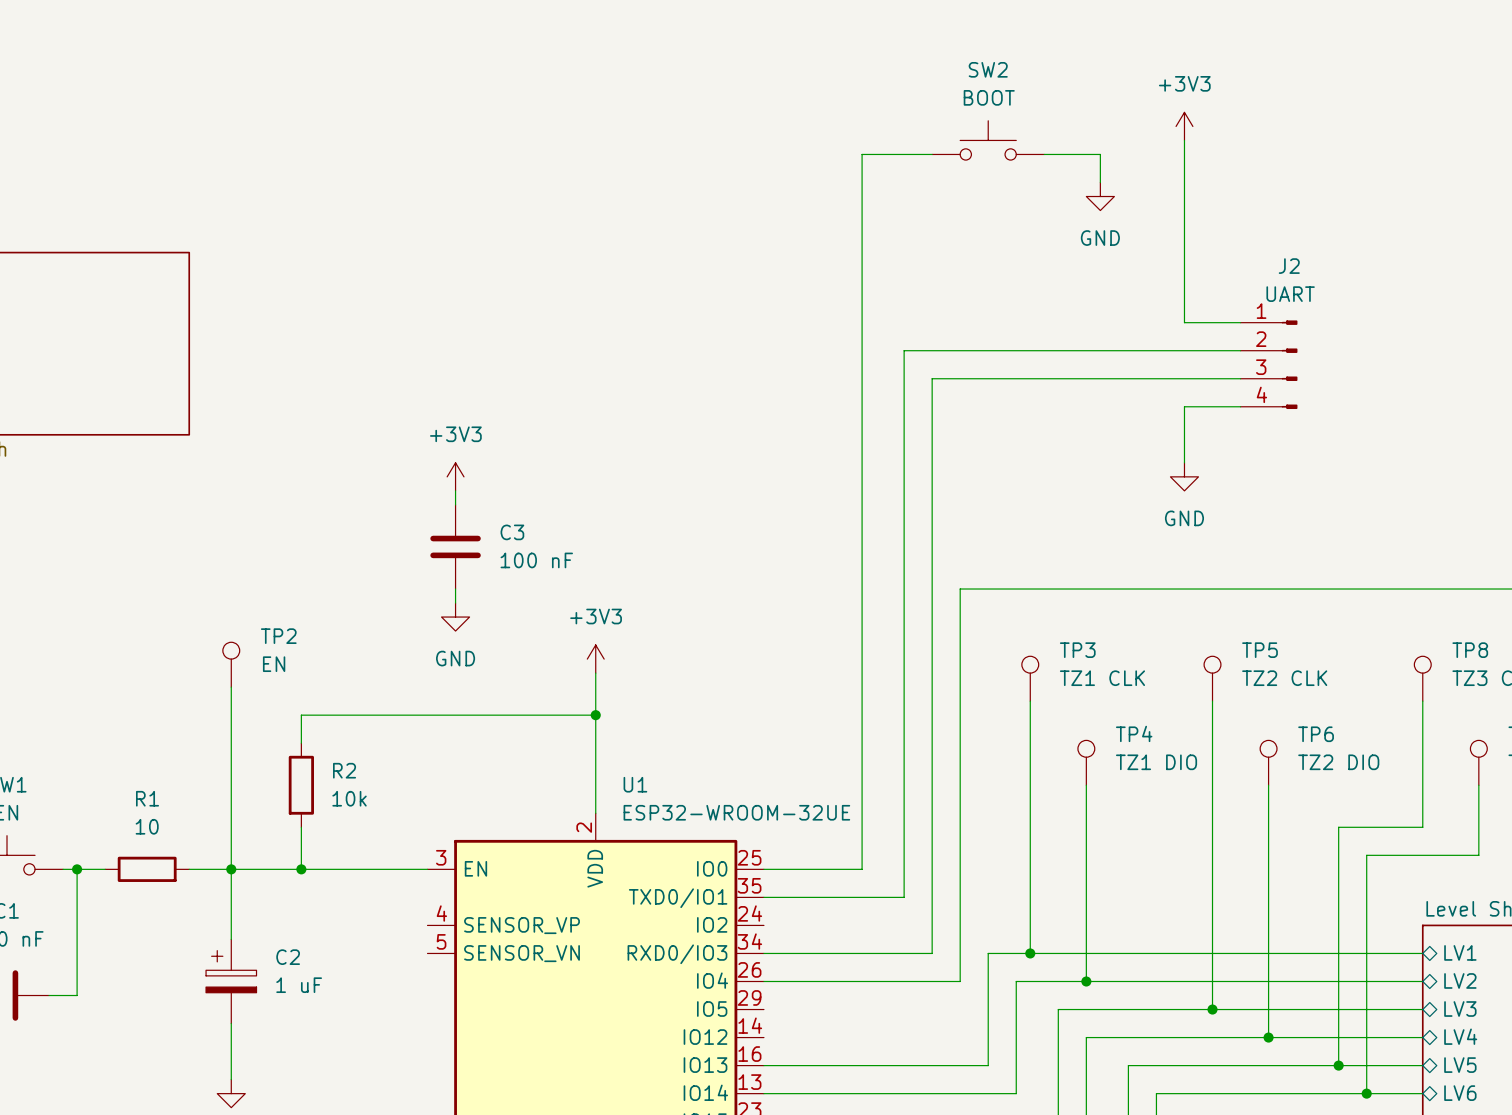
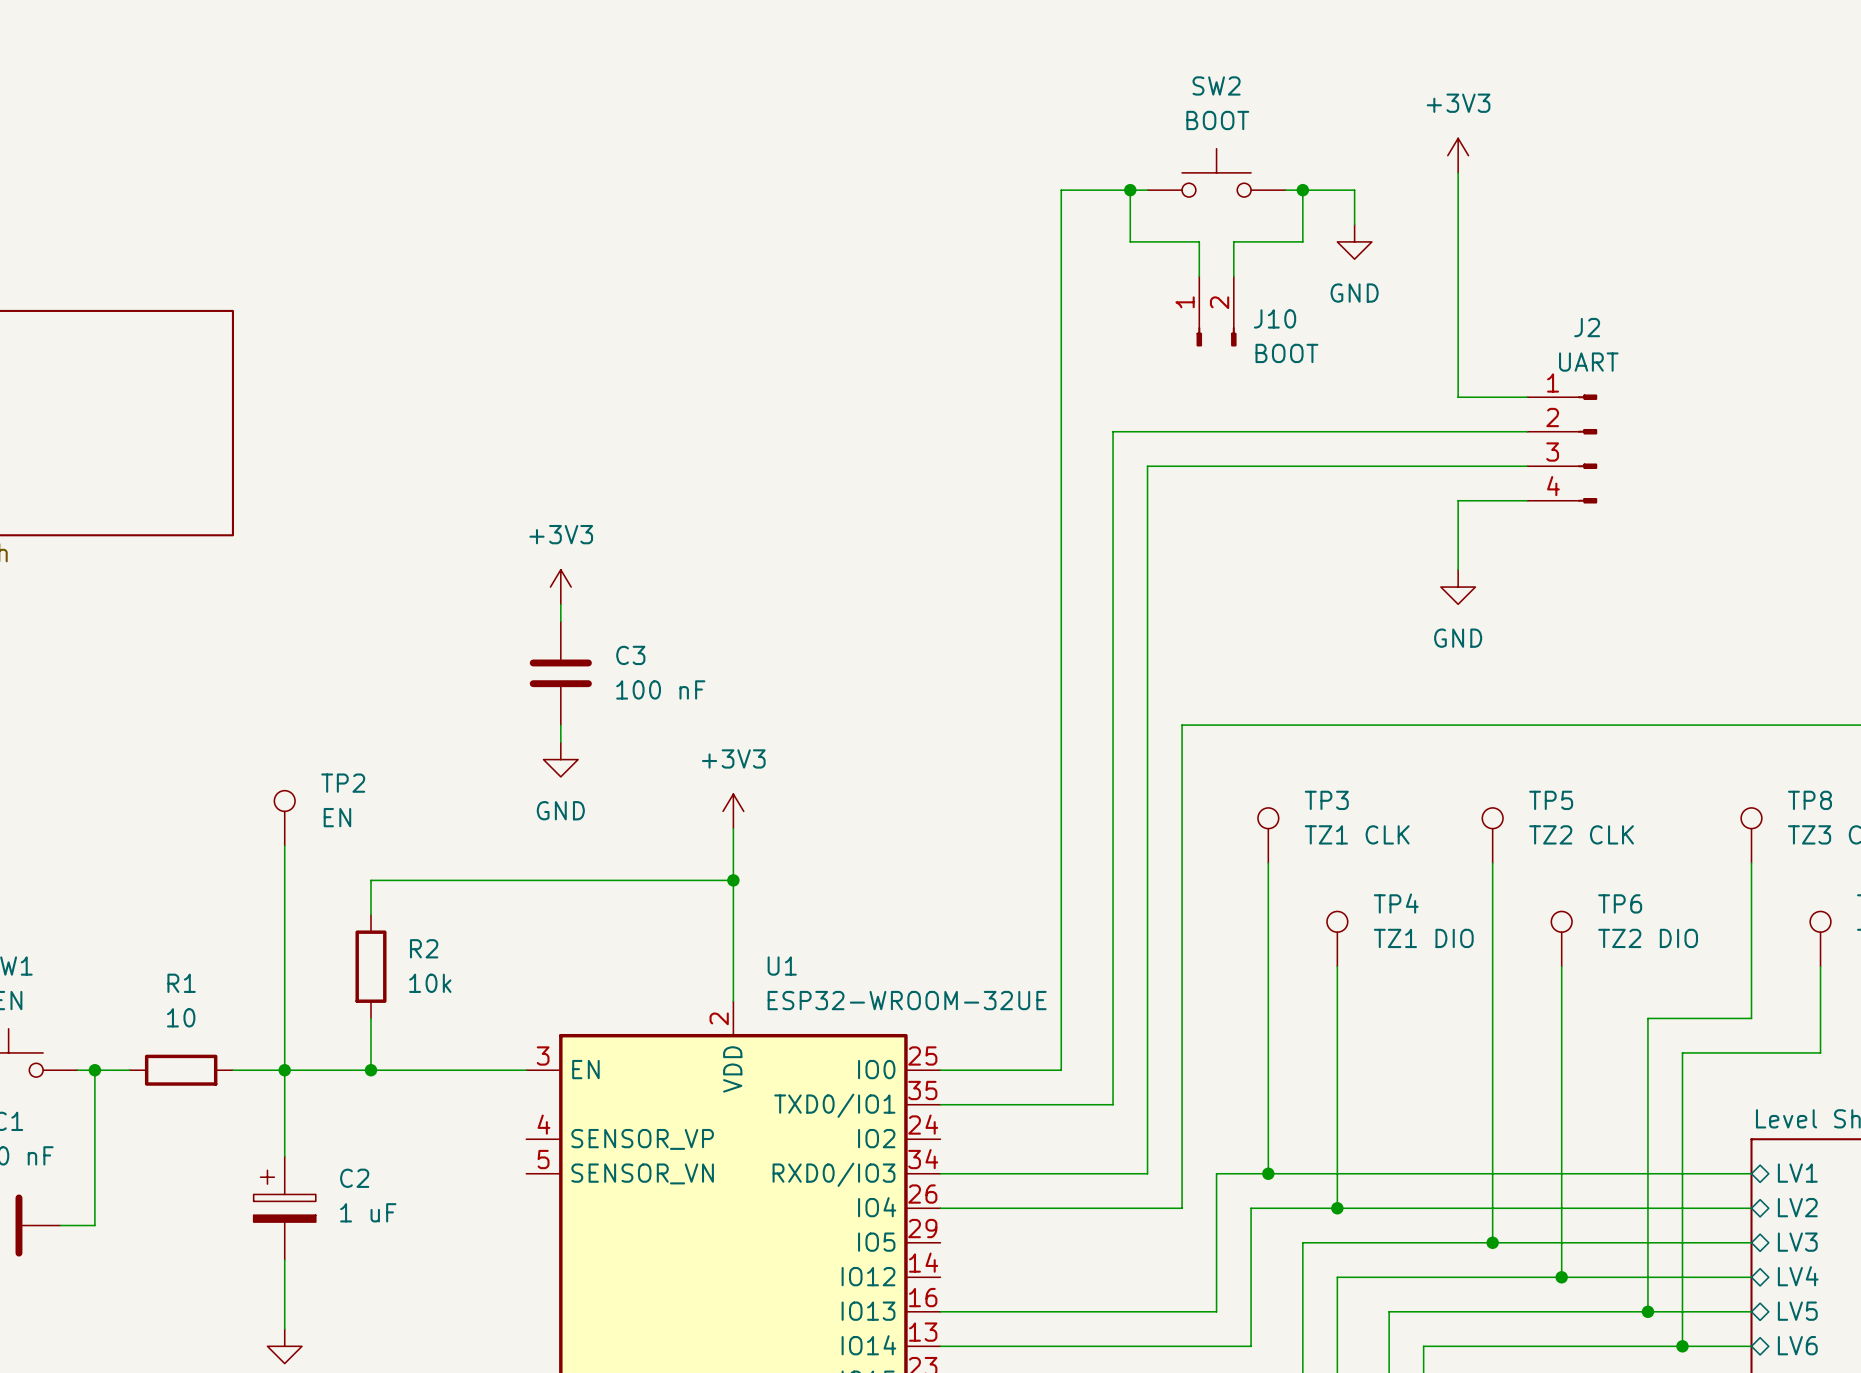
wire: none -> (1130, 190) (1130, 241) (1199, 241) (1199, 276)
junction: none -> (1130, 190)
wire: none -> (1302, 190) (1302, 241) (1233, 241) (1233, 276)
junction: none -> (1302, 190)
J10: none -> BOOT (1216, 311)

